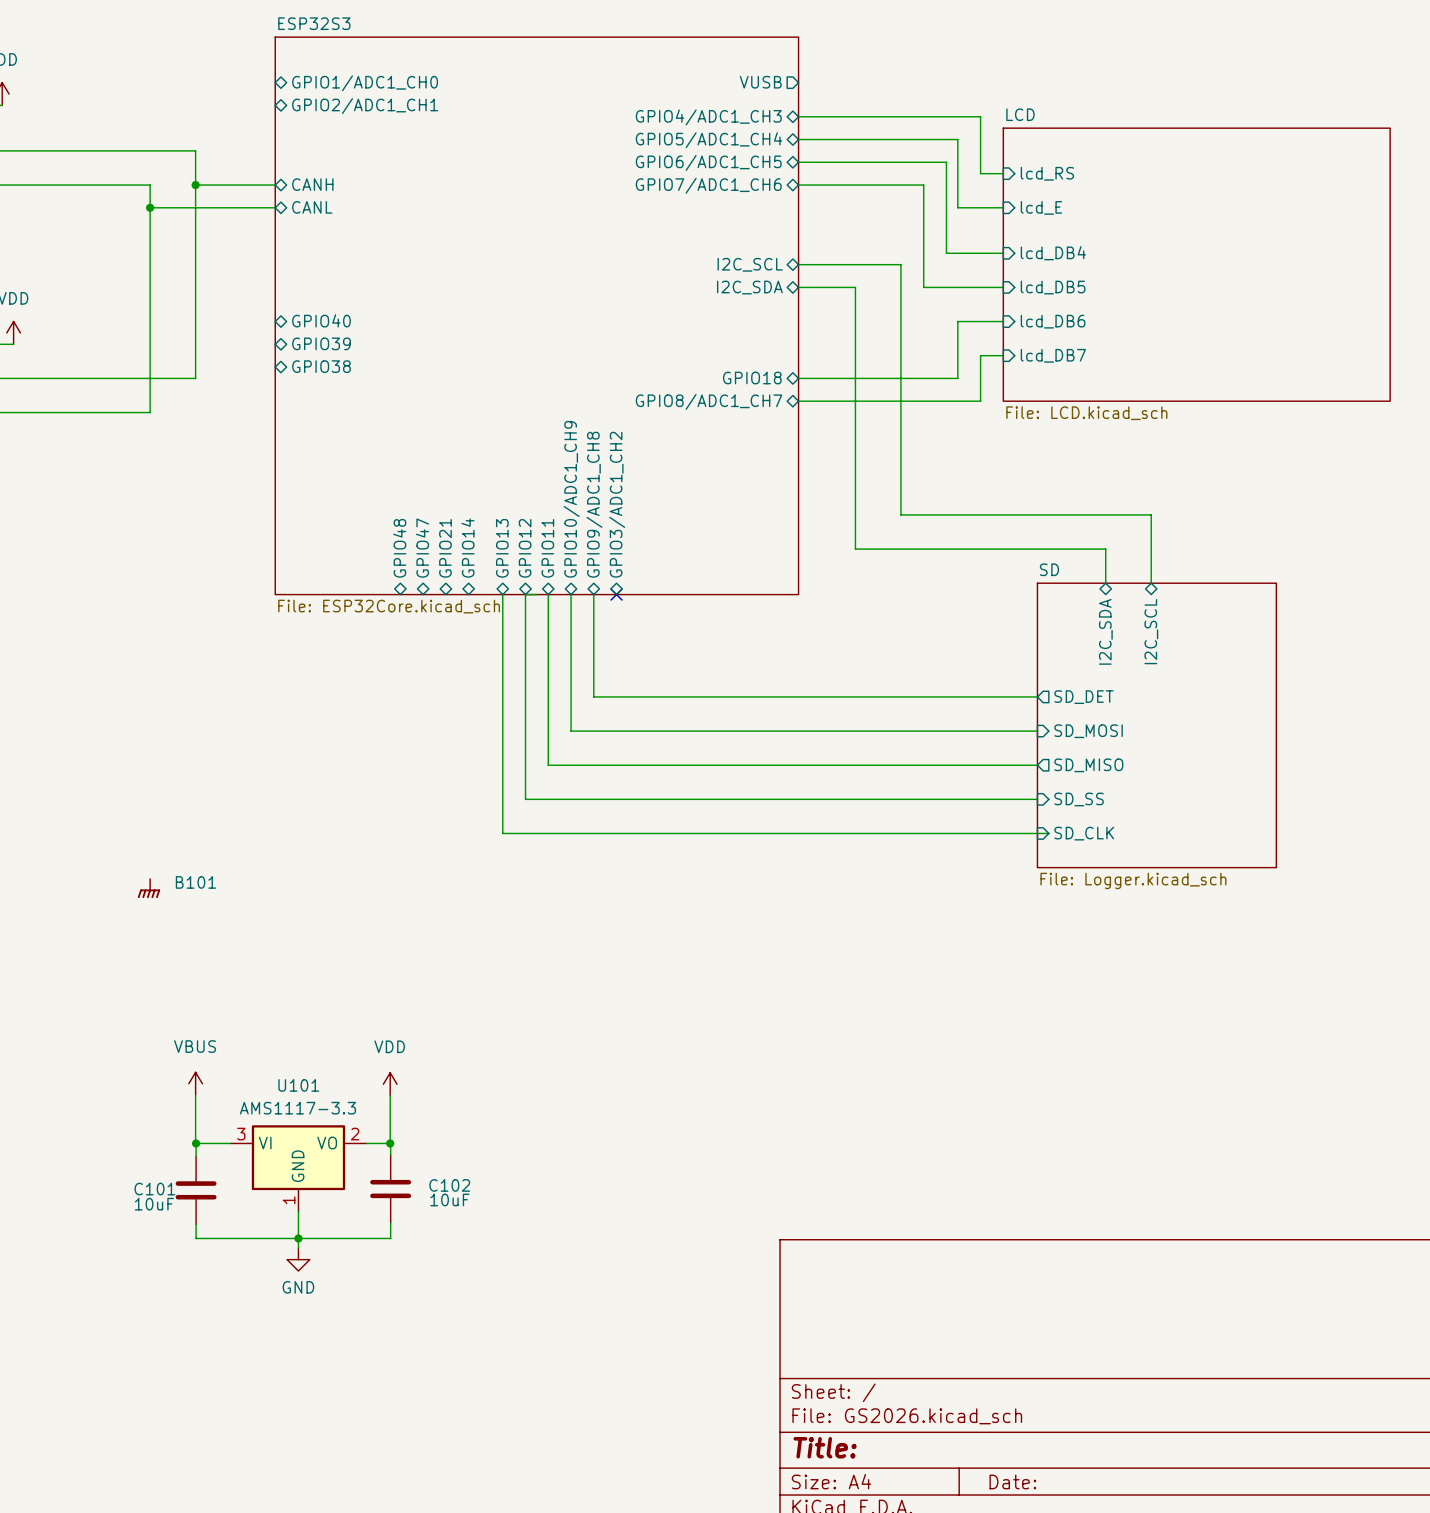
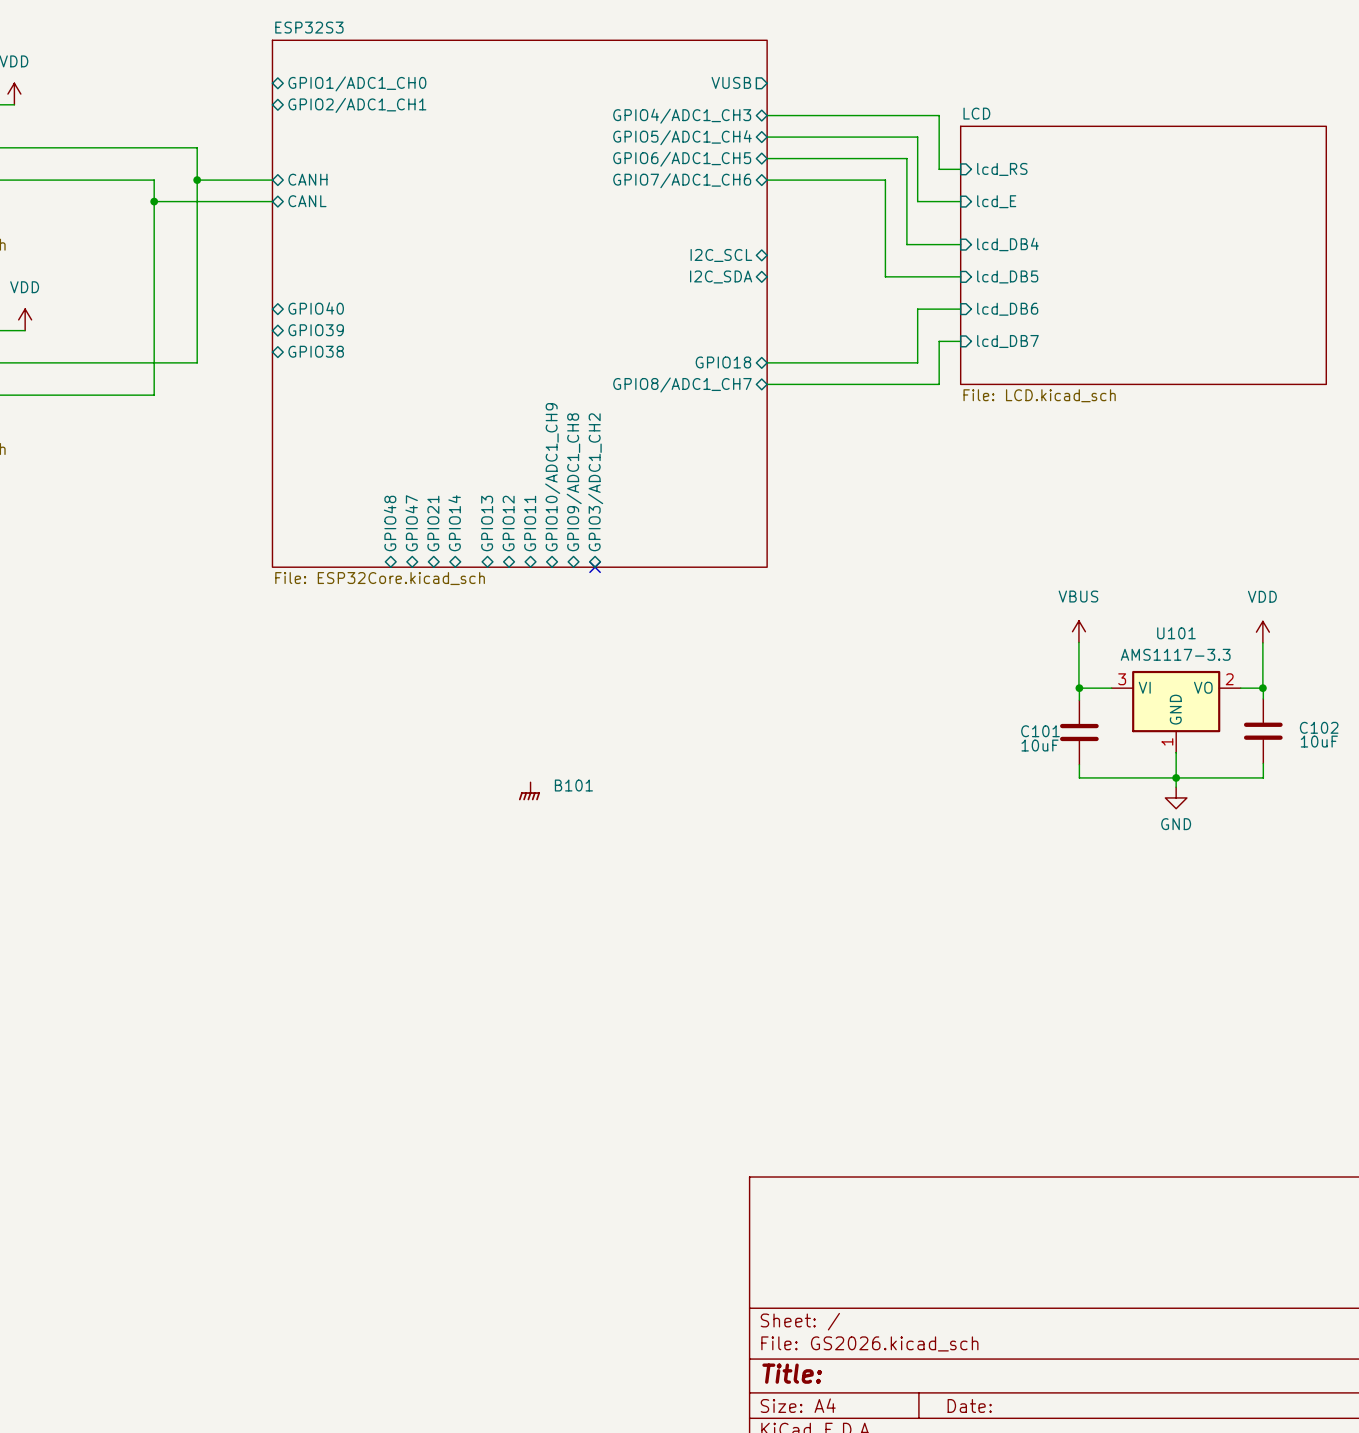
wire: (798, 264) (900, 264) (900, 514) (1151, 514) (1151, 583) -> none
wire: (798, 287) (855, 287) (855, 549) (1105, 549) (1105, 583) -> none
wire: (502, 594) (502, 833) (1048, 833) -> none
wire: (536, 594) (525, 594) (525, 799) (1037, 799) -> none
wire: (548, 594) (548, 765) (1037, 765) -> none
wire: (571, 594) (571, 731) (1037, 731) -> none
wire: (593, 594) (593, 696) (1037, 696) -> none
sheet pin: I2C_SDA (1105, 631) -> none
sheet pin: I2C_SCL (1151, 631) -> none
power symbol: none -> VBUS (1078, 631)
power symbol: none -> VDD (1262, 632)
wire: none -> (1078, 642) (1078, 688) (1111, 688)
wire: none -> (1262, 642) (1262, 688)
sheet pin: SD_DET (1083, 697) -> none
wire: none -> (1079, 688) (1079, 700)
junction: none -> (1079, 688)
wire: none -> (1240, 688) (1263, 688) (1263, 698)
junction: none -> (1262, 688)
sheet SD: File: Logger.kicad_sch (1156, 725) -> none
sheet pin: SD_MOSI (1088, 731) -> none
sheet pin: SD_MISO (1088, 765) -> none
wire: none -> (1176, 752) (1176, 787)
sheet pin: SD_SS (1079, 799) -> none
wire: none -> (1263, 763) (1263, 777) (1079, 777) (1079, 764)
junction: none -> (1176, 777)
sheet pin: SD_CLK (1084, 833) -> none
power symbol: none -> GND (1176, 797)
B101 position: (148, 888) -> (529, 791)
power symbol: VBUS (195, 1083) -> none
power symbol: VDD (390, 1084) -> none
wire: (195, 1095) (195, 1143) (230, 1143) -> none
wire: (390, 1095) (390, 1143) -> none
wire: (196, 1143) (196, 1156) -> none
junction: (196, 1143) -> none
wire: (366, 1143) (390, 1143) (390, 1154) -> none
junction: (390, 1143) -> none
U101 position: (298, 1168) -> (1176, 711)
C102 position: (390, 1189) -> (1263, 731)
C101 position: (196, 1190) -> (1079, 732)
wire: (298, 1211) (298, 1248) -> none
wire: (390, 1223) (390, 1238) (196, 1238) (196, 1224) -> none
junction: (298, 1238) -> none
power symbol: GND (298, 1259) -> none

